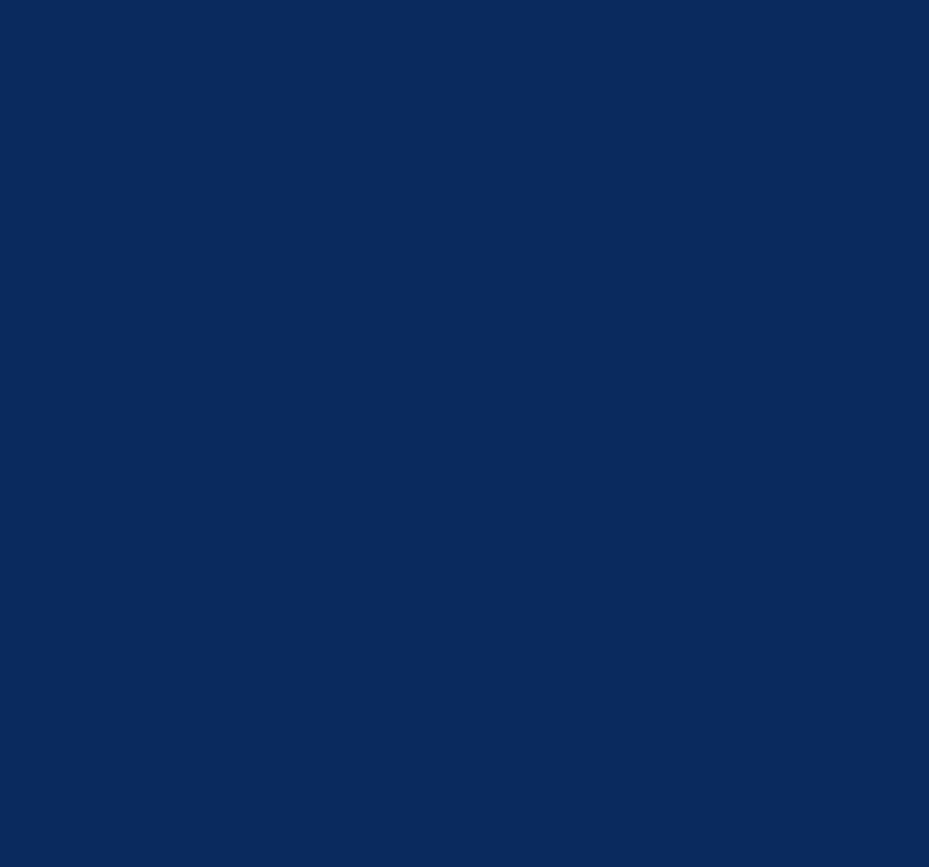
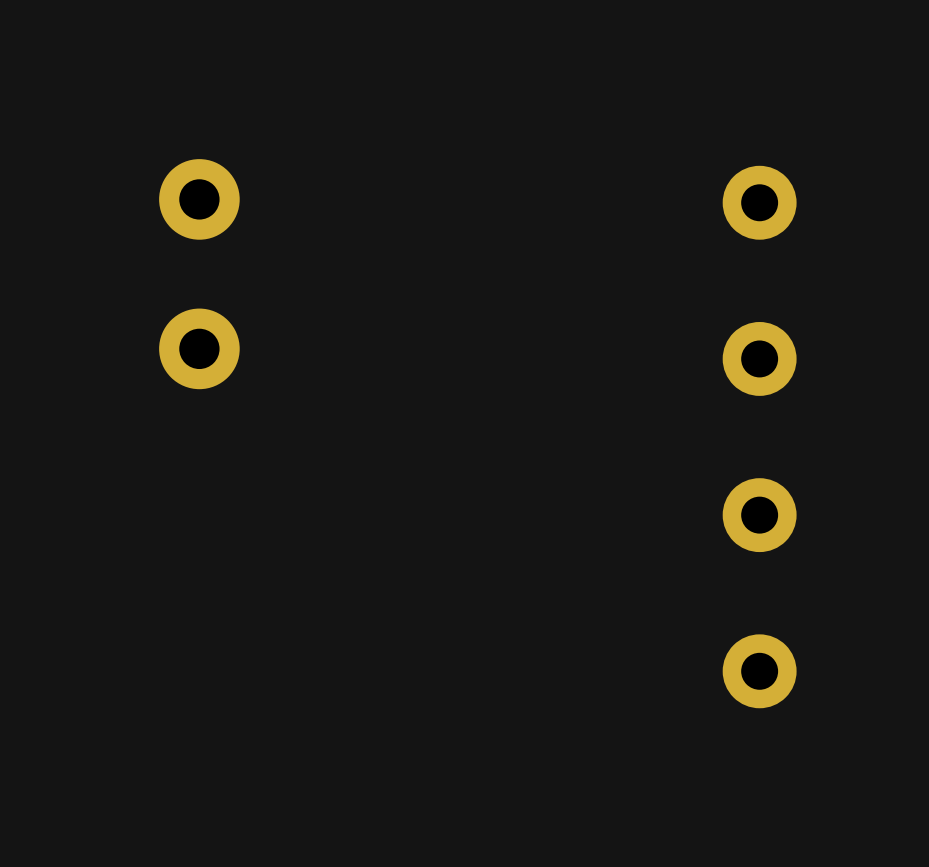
part: none -> (199, 199)
part: none -> (759, 202)
part: none -> (199, 348)
part: none -> (759, 358)
part: none -> (759, 515)
part: none -> (759, 671)

